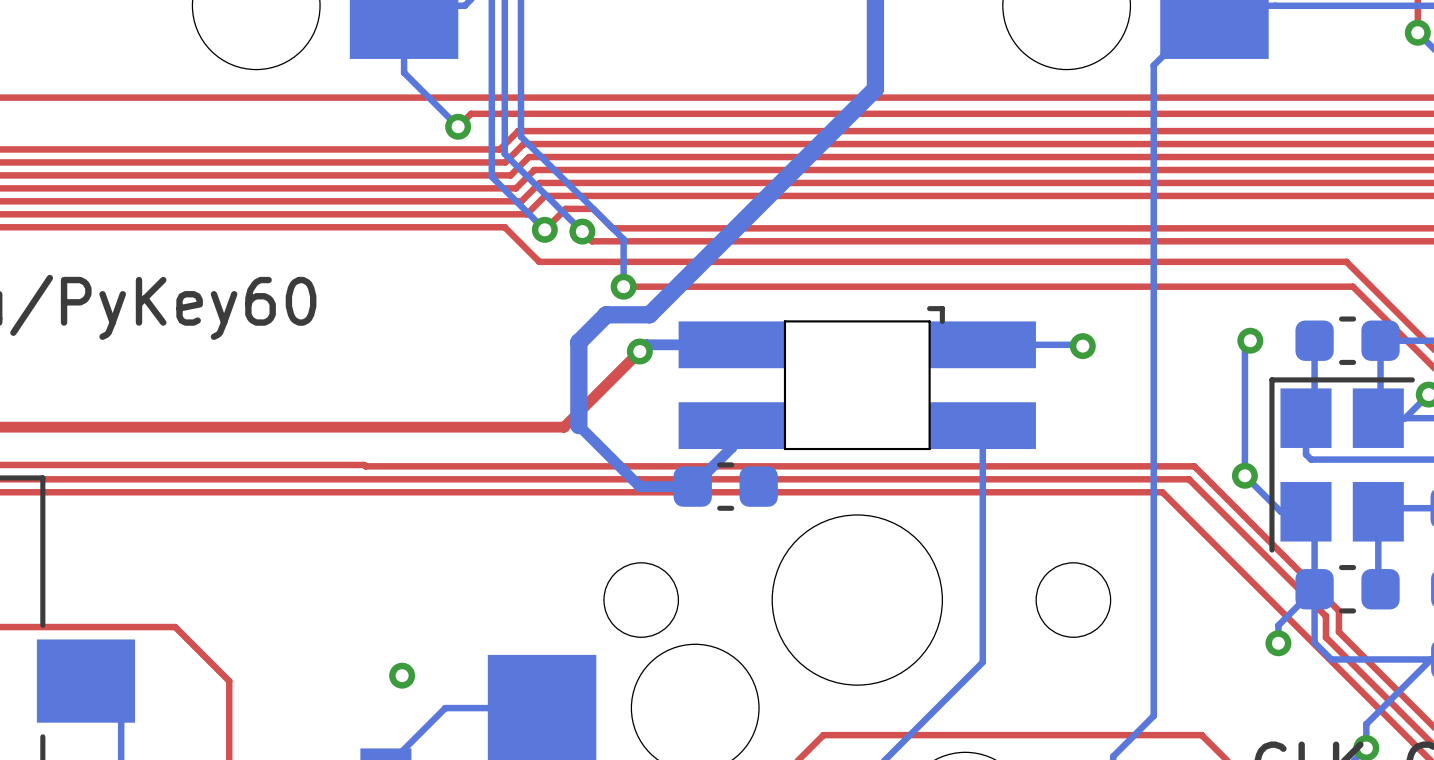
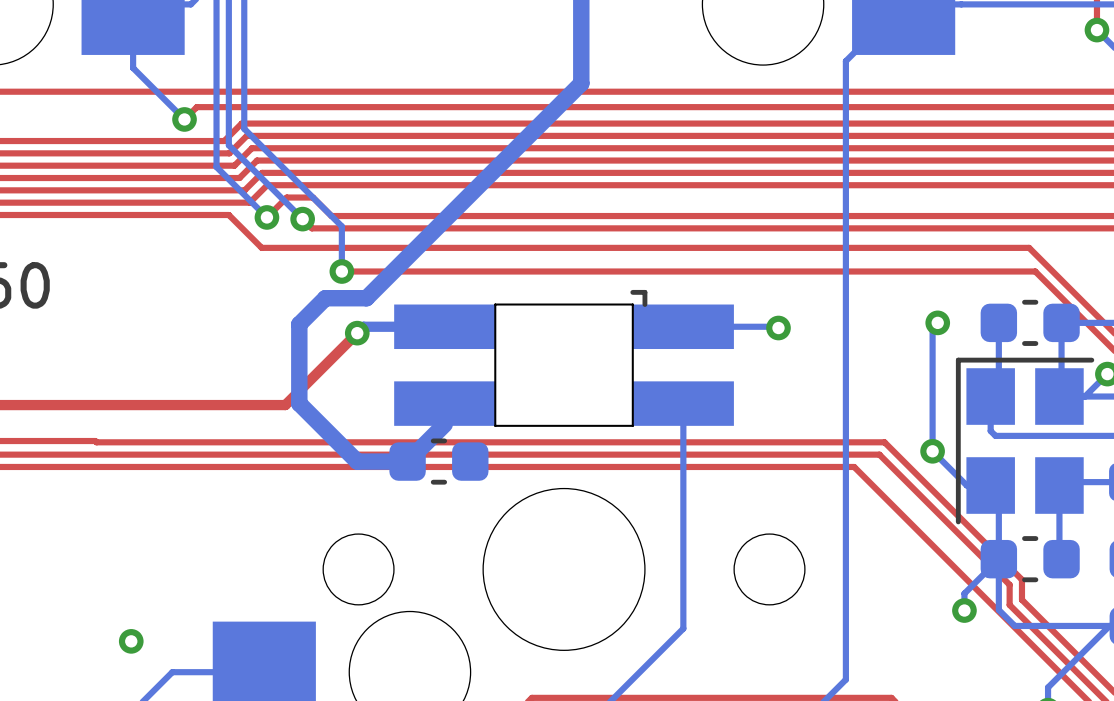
bottom track width: thin (578, 425) (639, 486) (692, 486) (731, 447) -> thick (299, 403) (357, 461) (407, 461) (444, 424)

